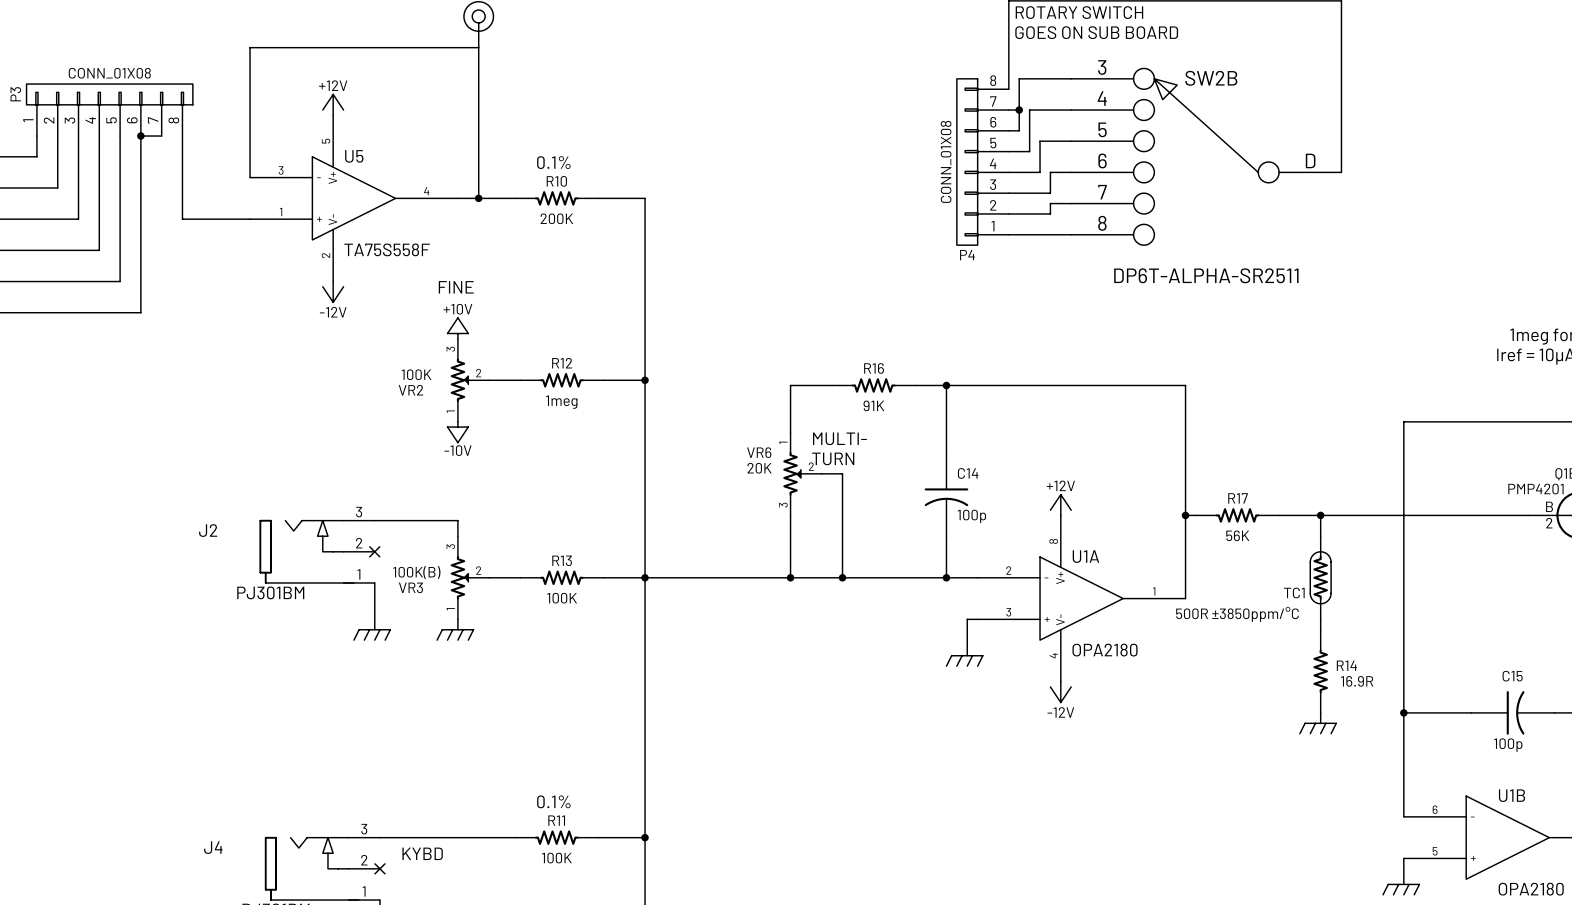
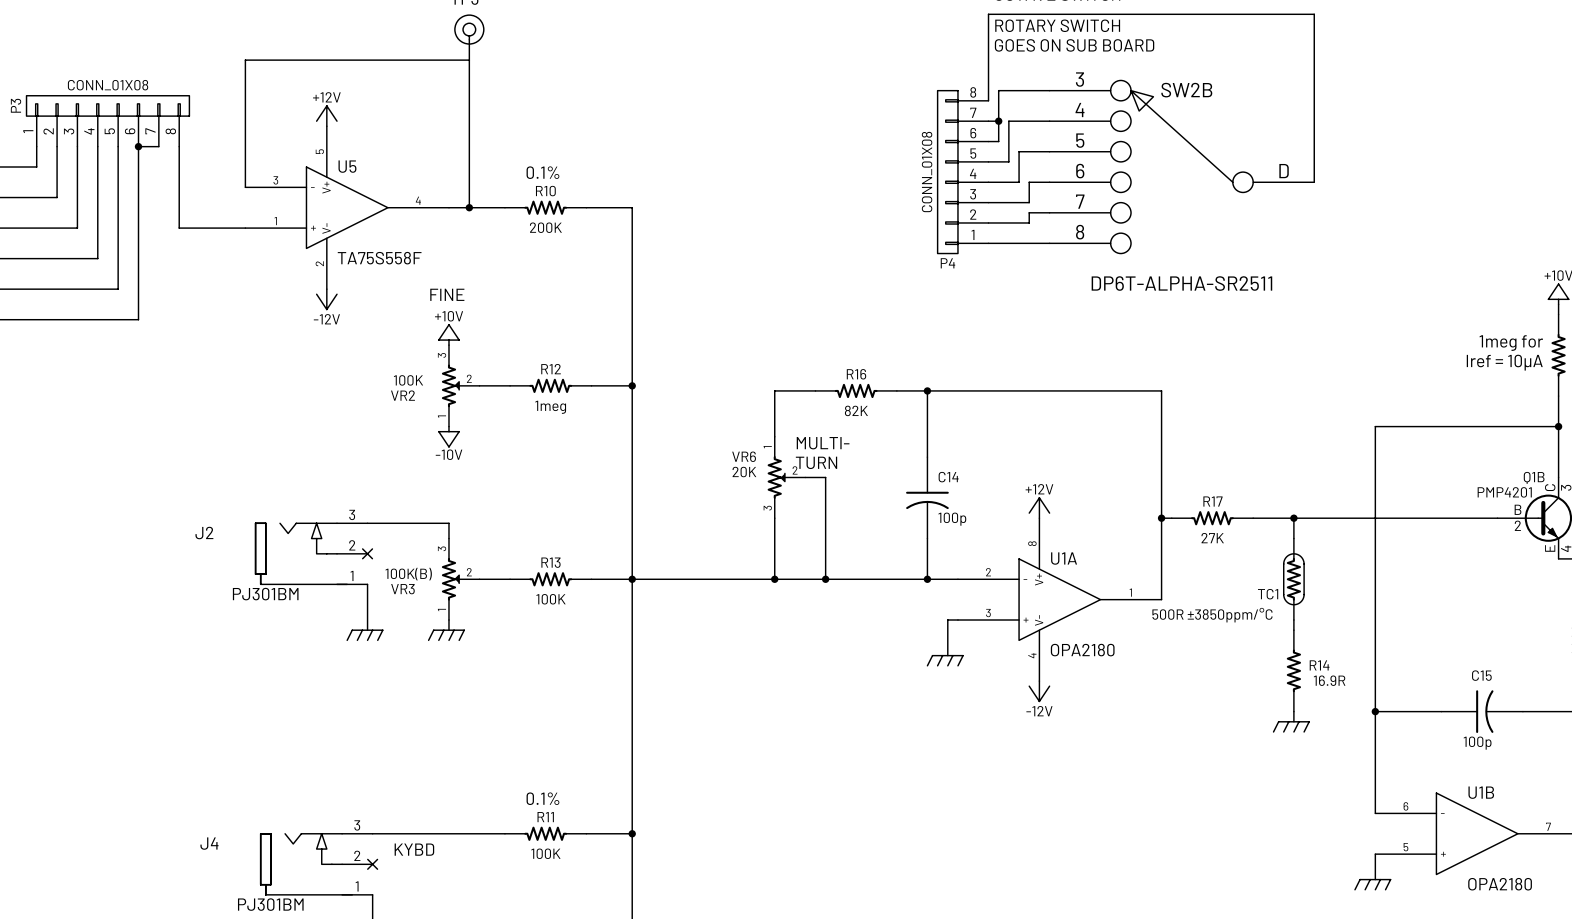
R16 value: 91K (873, 405) -> 82K (856, 410)
R17 value: 56K (1237, 535) -> 27K (1212, 538)

